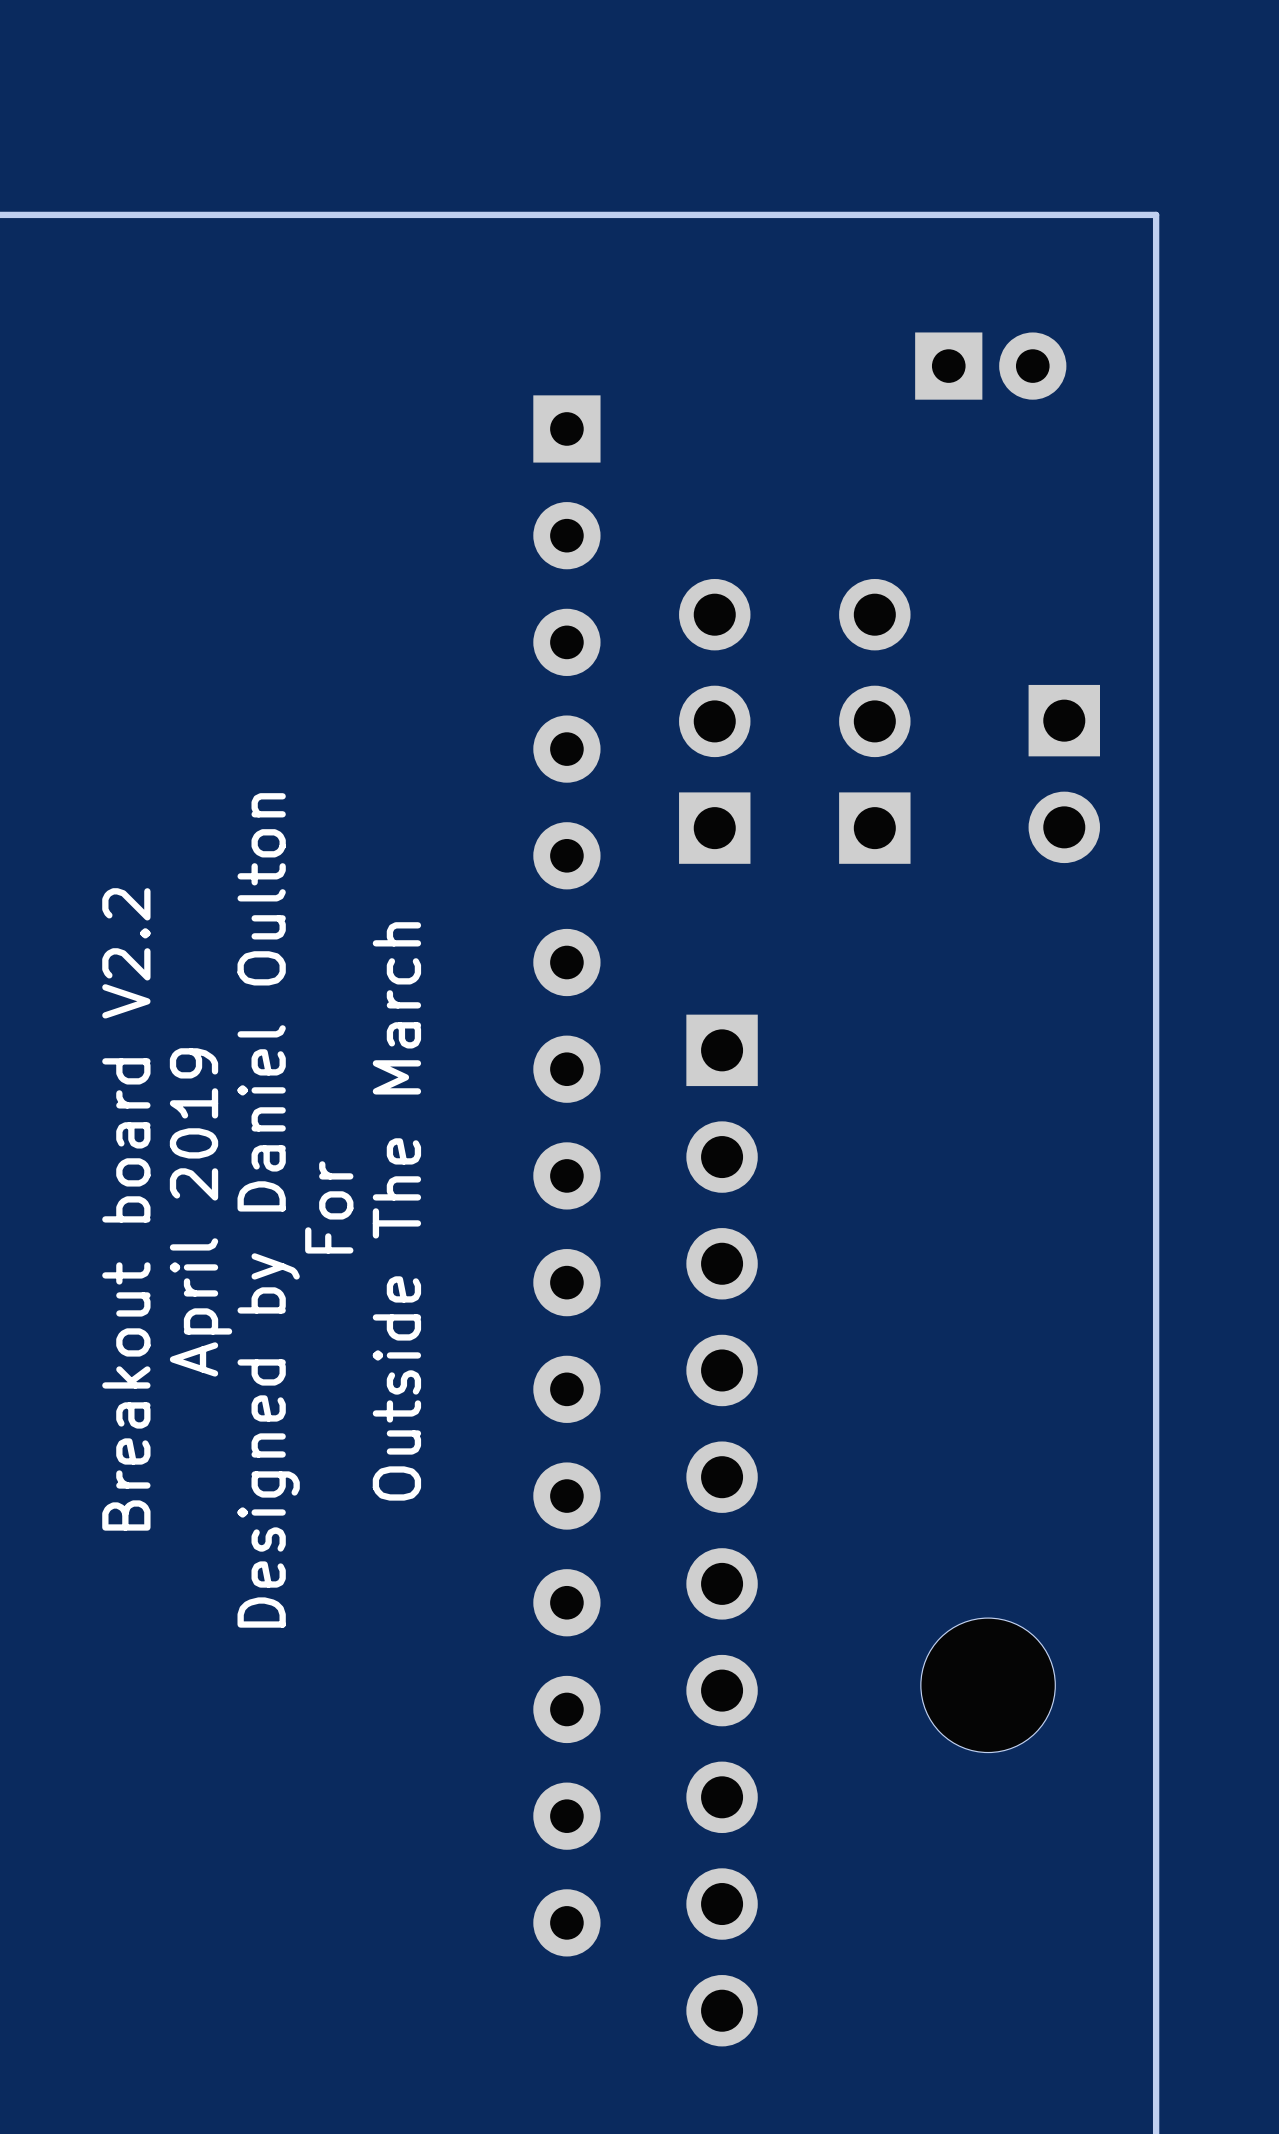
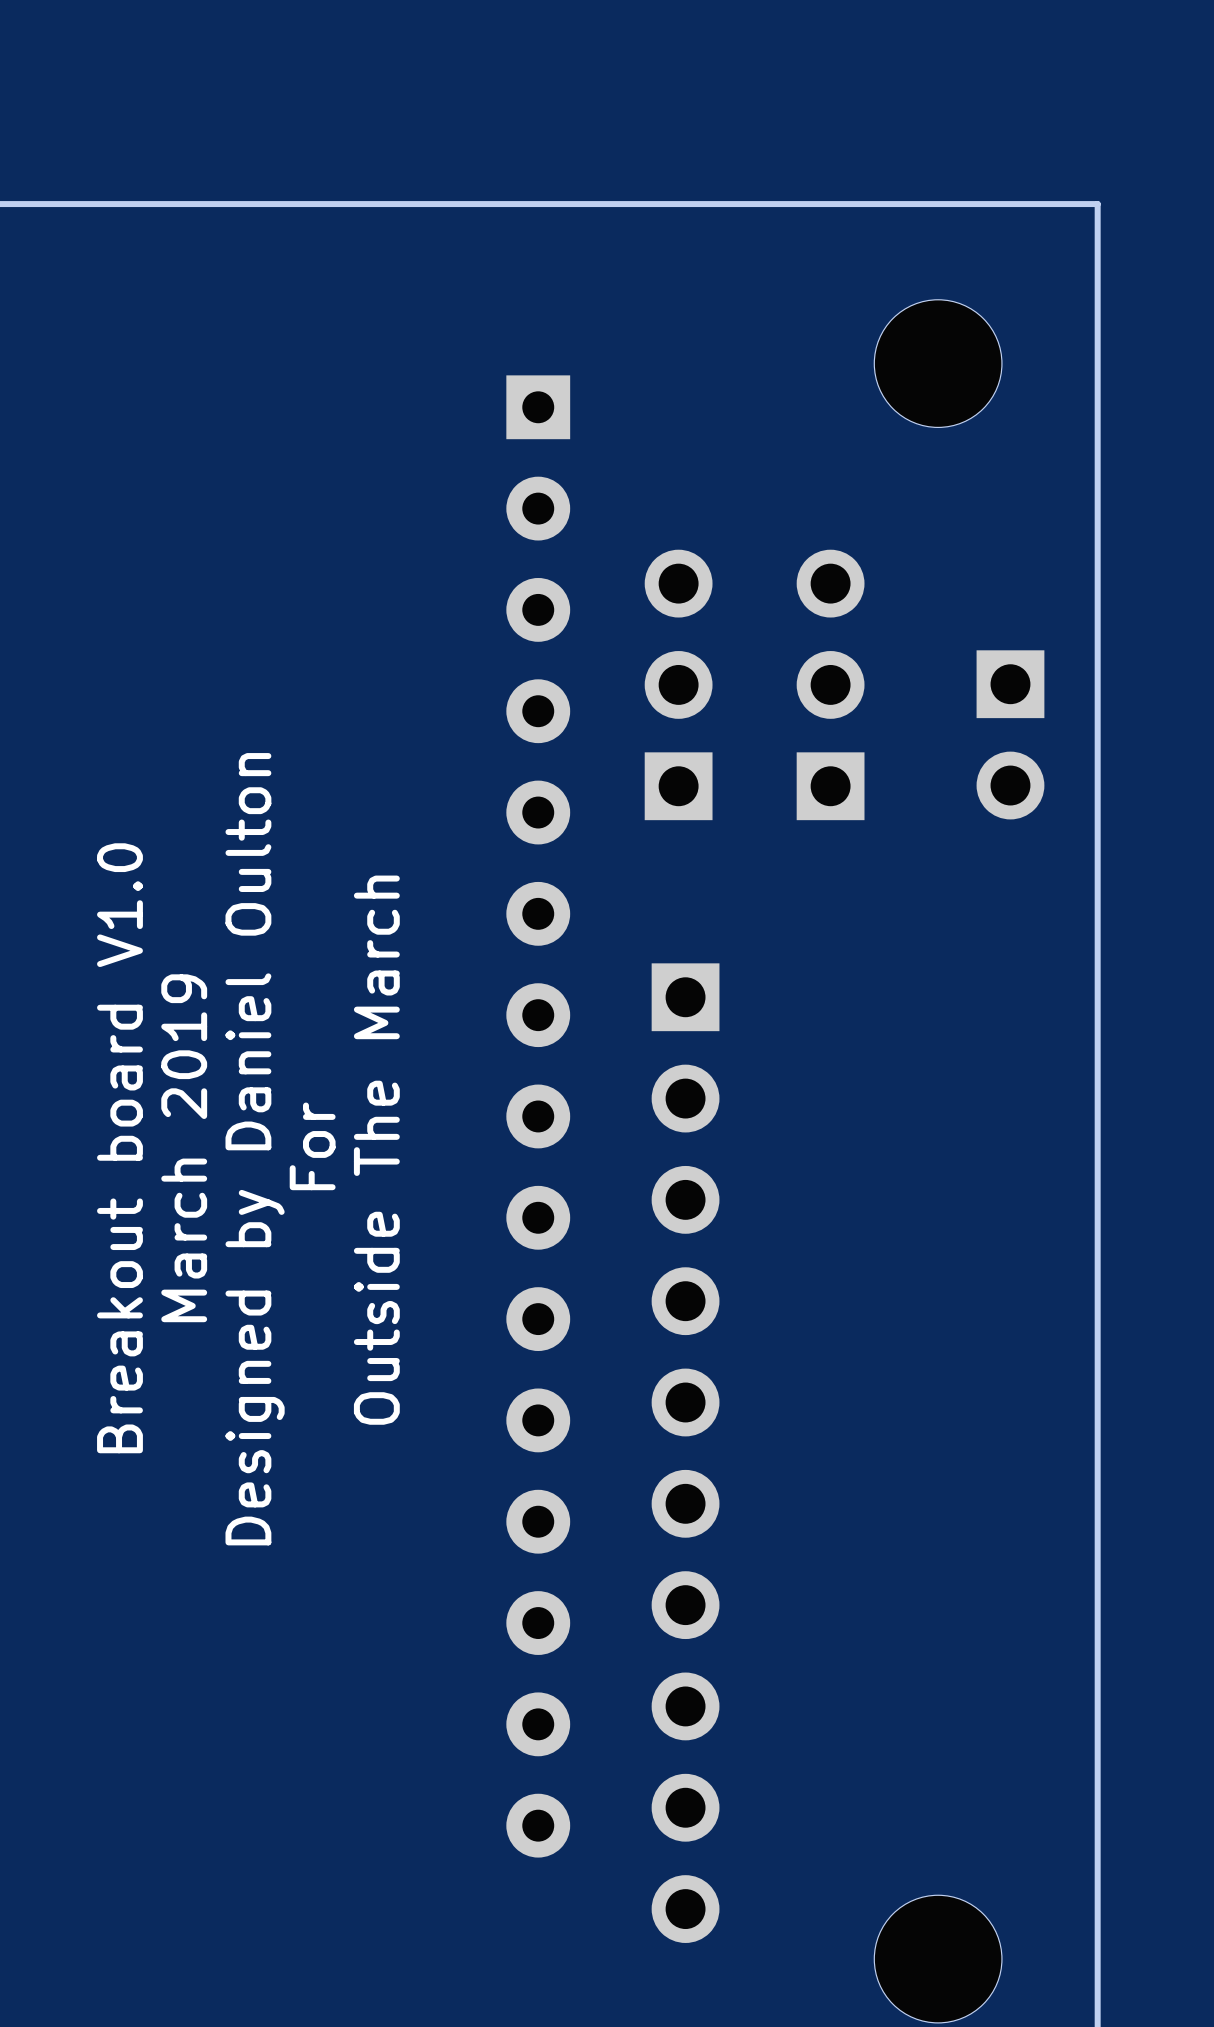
part footprint: [915, 332, 1067, 400] -> [874, 299, 1002, 428]
text: Breakout board V2.2 (126, 1209) -> Breakout board V1.0 (119, 1148)
text: April 2019 (201, 1212) -> March 2019 (184, 1148)
part position: (988, 1685) -> (938, 1959)

